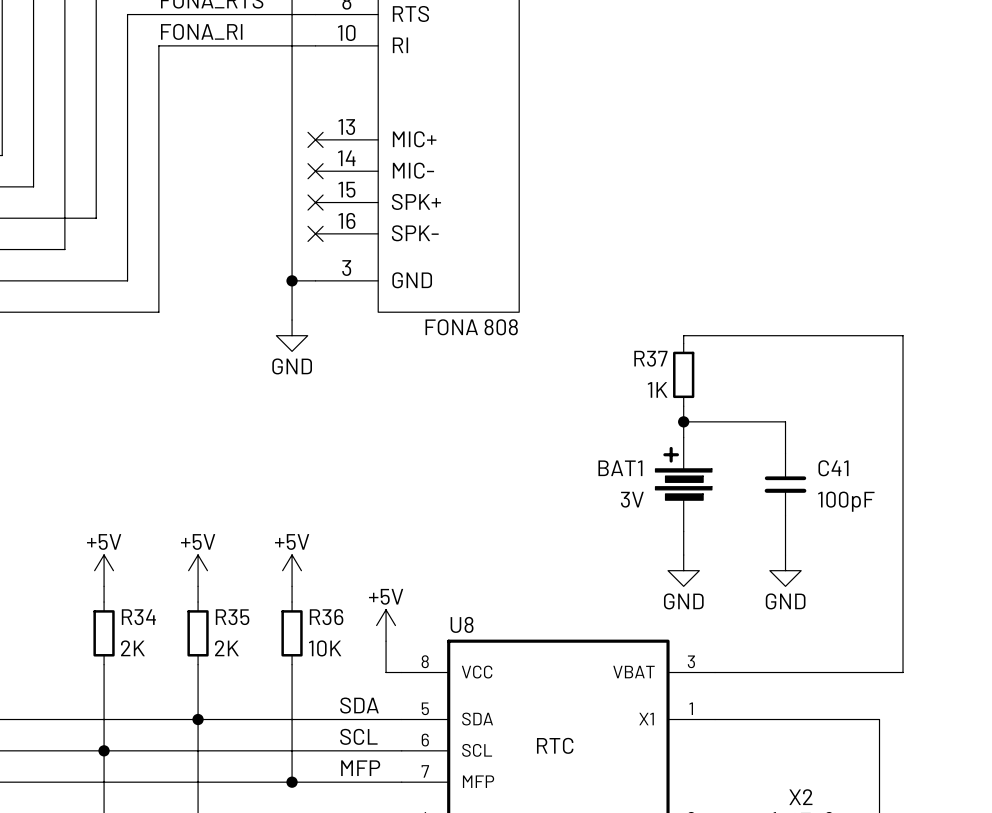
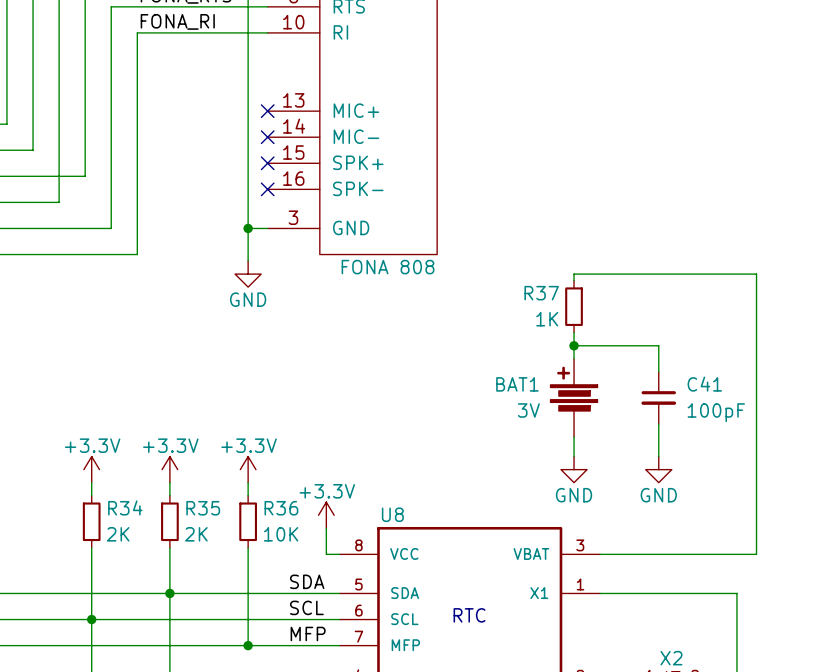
power symbol: +5V (104, 570) -> +3.3V (91, 469)
power symbol: +5V (198, 570) -> +3.3V (169, 469)
power symbol: +5V (292, 570) -> +3.3V (248, 469)
power symbol: +5V (386, 625) -> +3.3V (326, 515)

